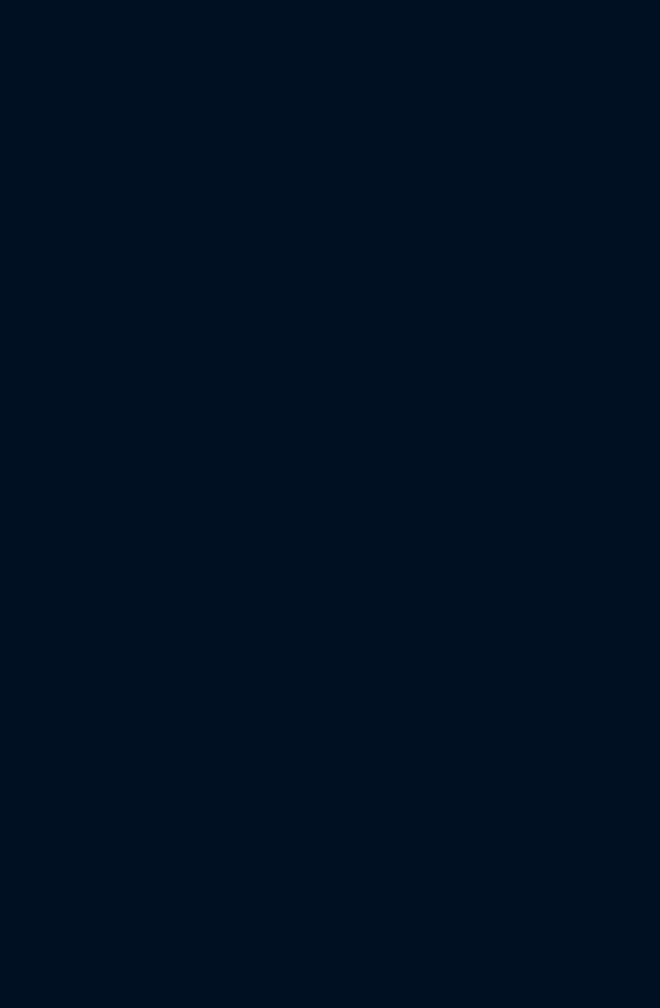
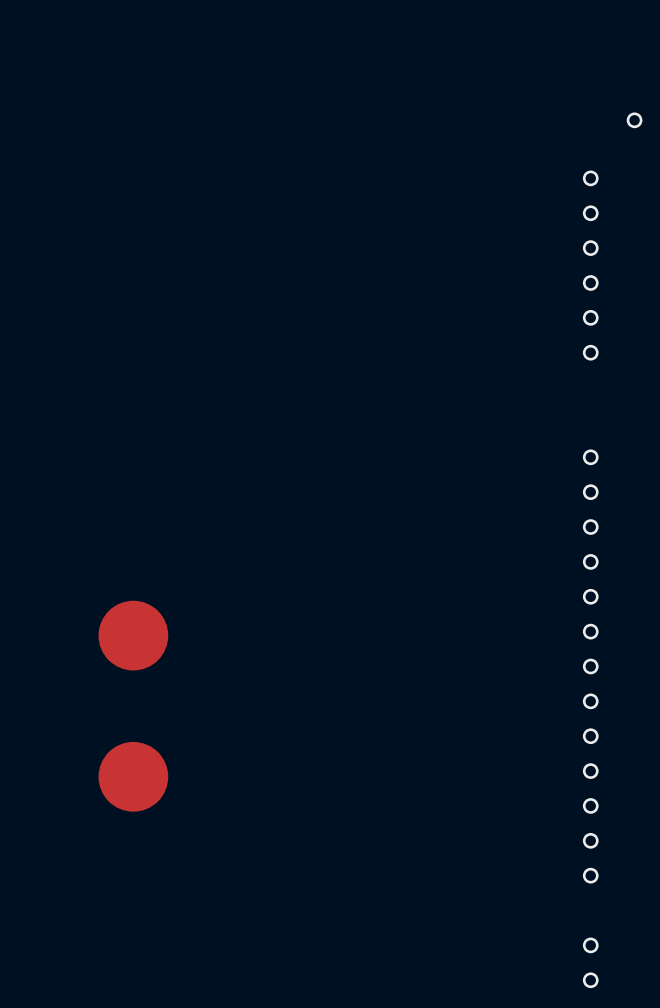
via: none -> (634, 120)
via: none -> (590, 178)
via: none -> (590, 213)
via: none -> (590, 248)
via: none -> (590, 282)
via: none -> (590, 317)
via: none -> (590, 352)
via: none -> (590, 457)
via: none -> (590, 492)
via: none -> (590, 527)
via: none -> (590, 561)
via: none -> (590, 596)
via: none -> (590, 631)
part: none -> (133, 635)
via: none -> (590, 666)
via: none -> (590, 701)
via: none -> (590, 736)
via: none -> (590, 771)
part: none -> (133, 776)
via: none -> (590, 805)
via: none -> (590, 840)
via: none -> (590, 875)
via: none -> (590, 945)
via: none -> (590, 980)

